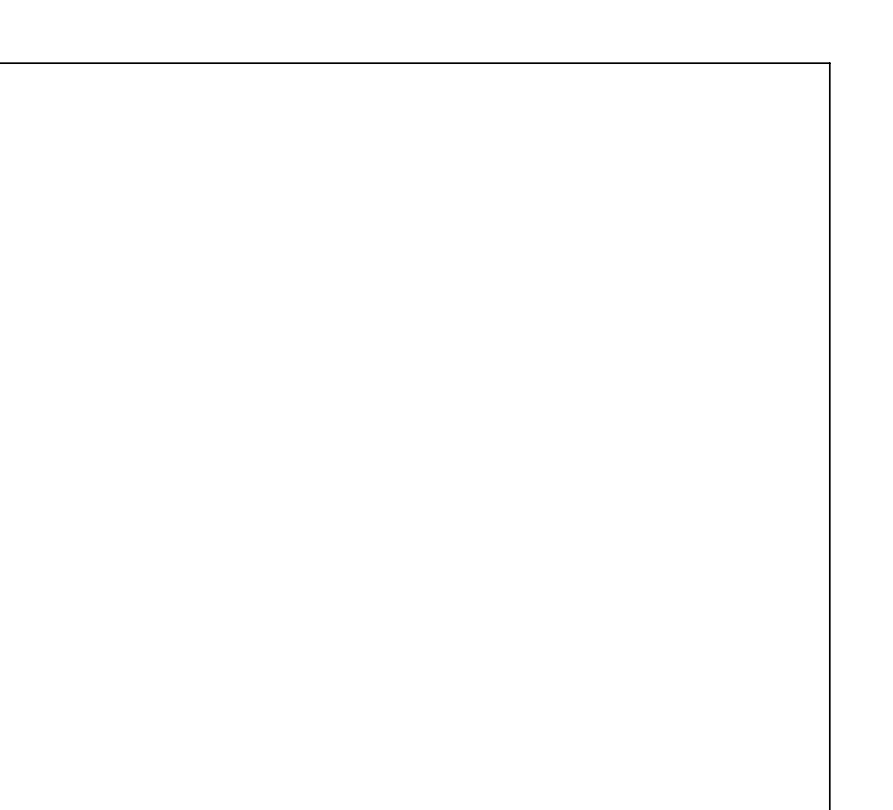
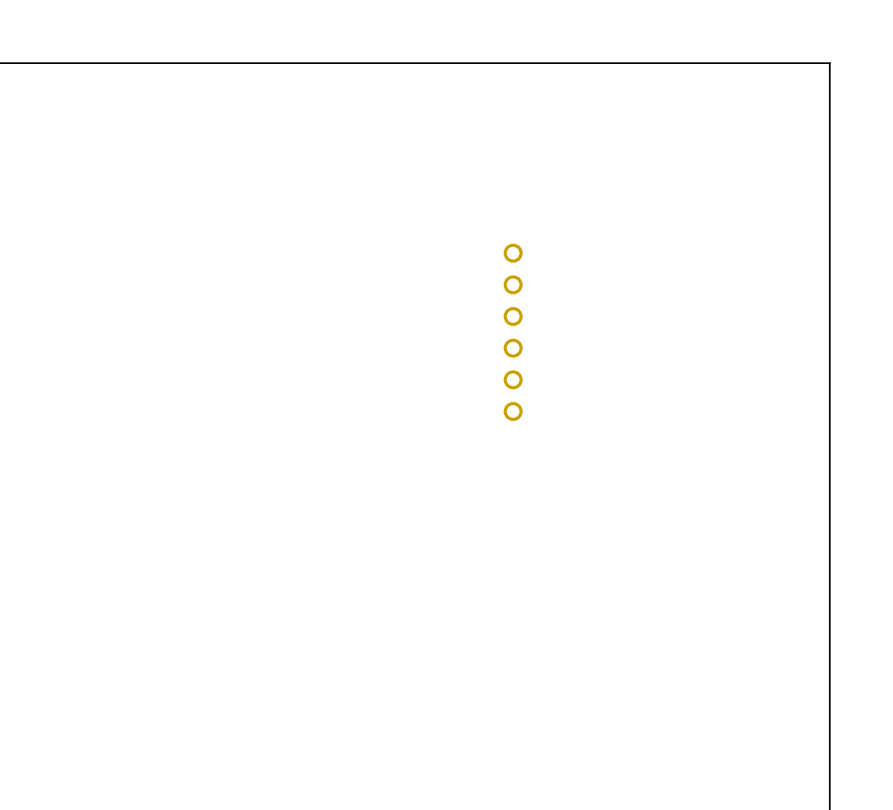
part: none -> (513, 332)

